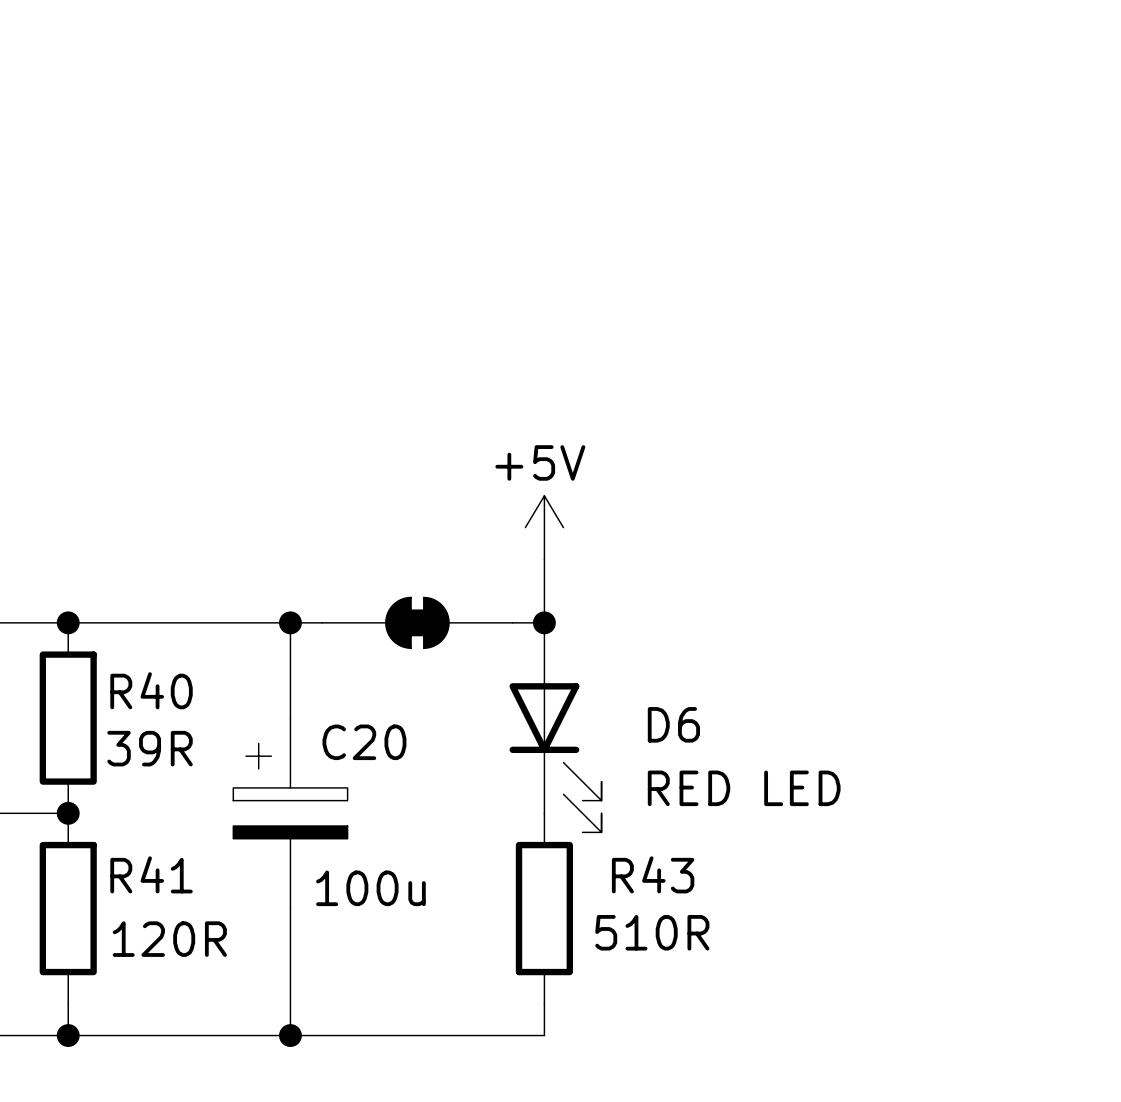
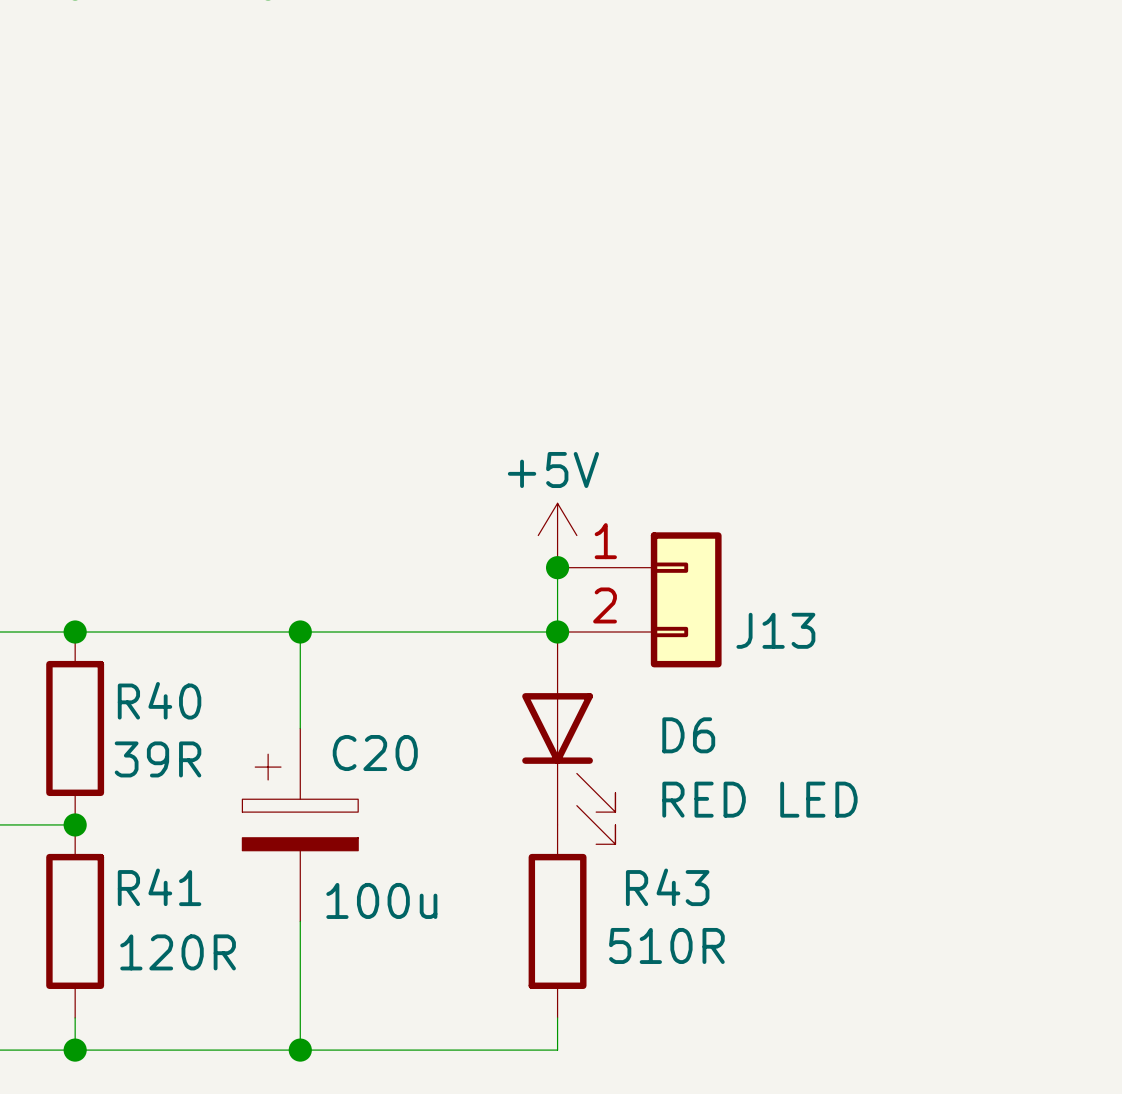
junction: none -> (557, 567)
J13: none -> (639, 599)
part: (417, 622) -> none

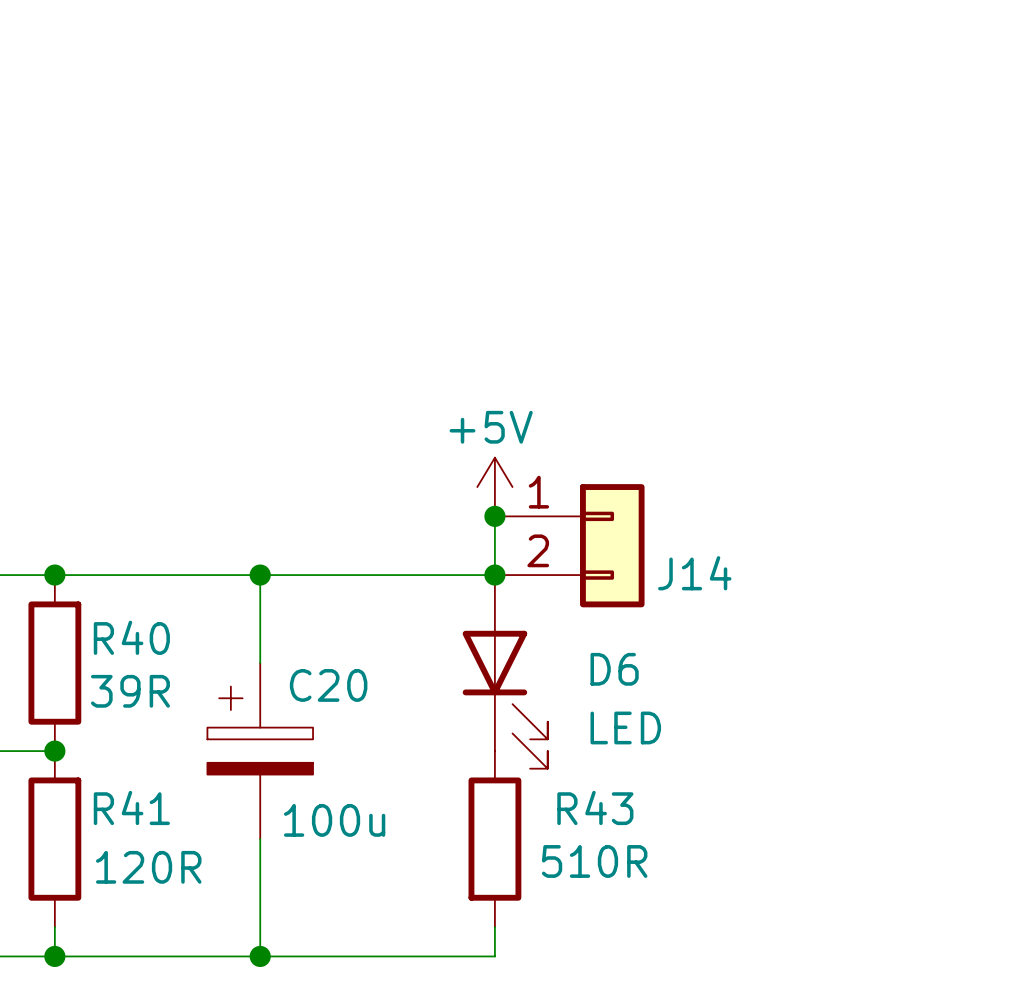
J13 name: J13 (775, 630) -> J14 (694, 573)
D6 value: RED LED (759, 799) -> LED (625, 727)

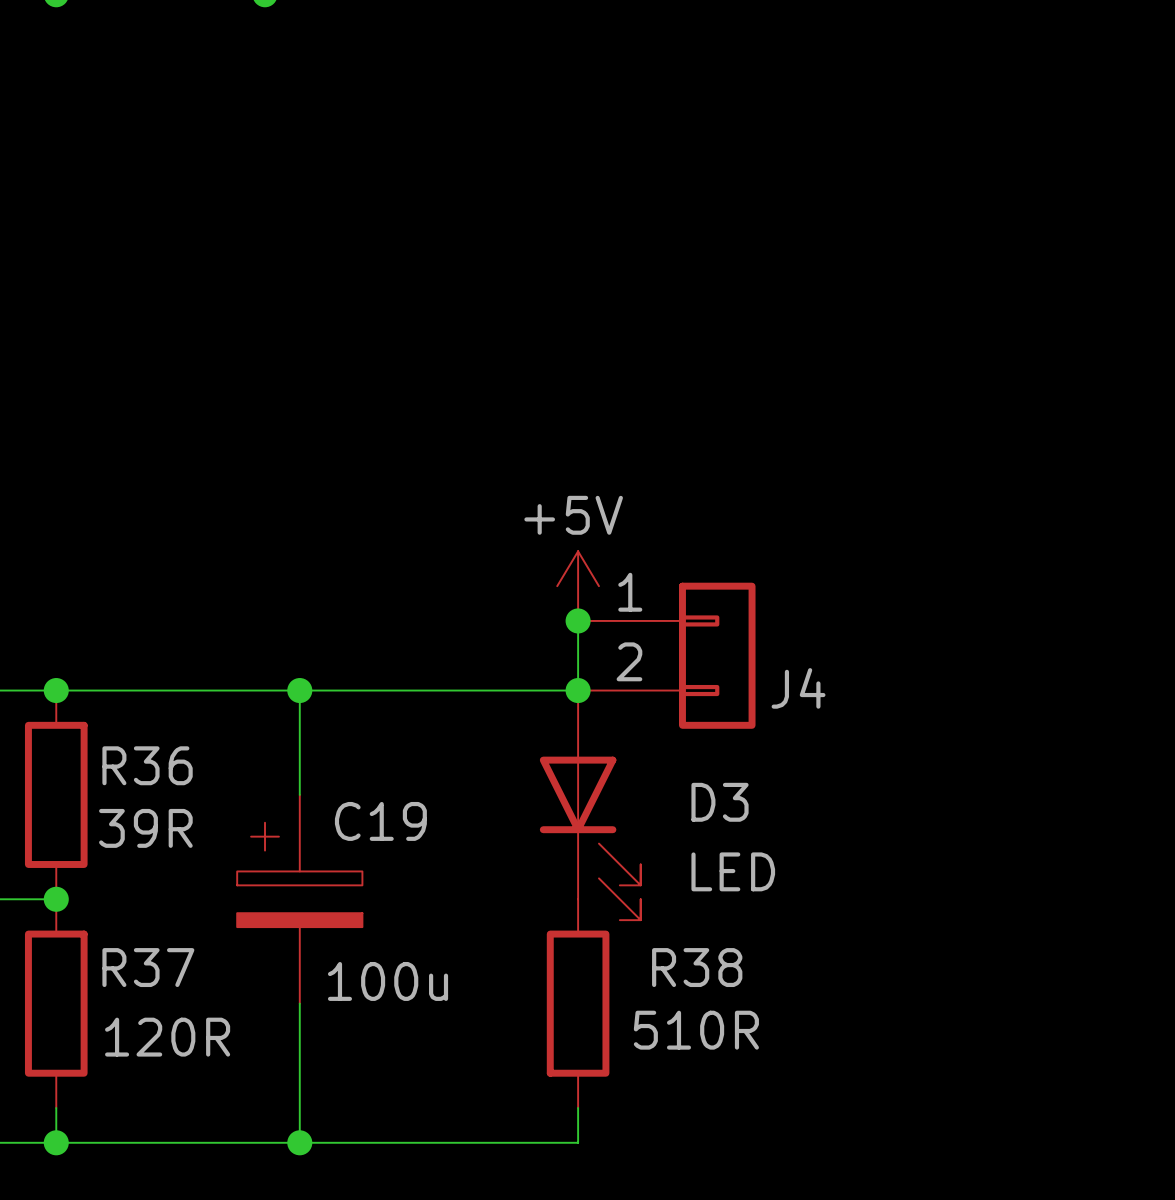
J14 name: J14 (694, 573) -> J4 (798, 688)
R40 name: R40 (131, 637) -> R36 (147, 765)
D6 name: D6 (614, 669) -> D3 (720, 802)
C20 name: C20 (328, 685) -> C19 (380, 821)
R41 name: R41 (131, 807) -> R37 (148, 967)
R43 name: R43 (595, 807) -> R38 (697, 967)

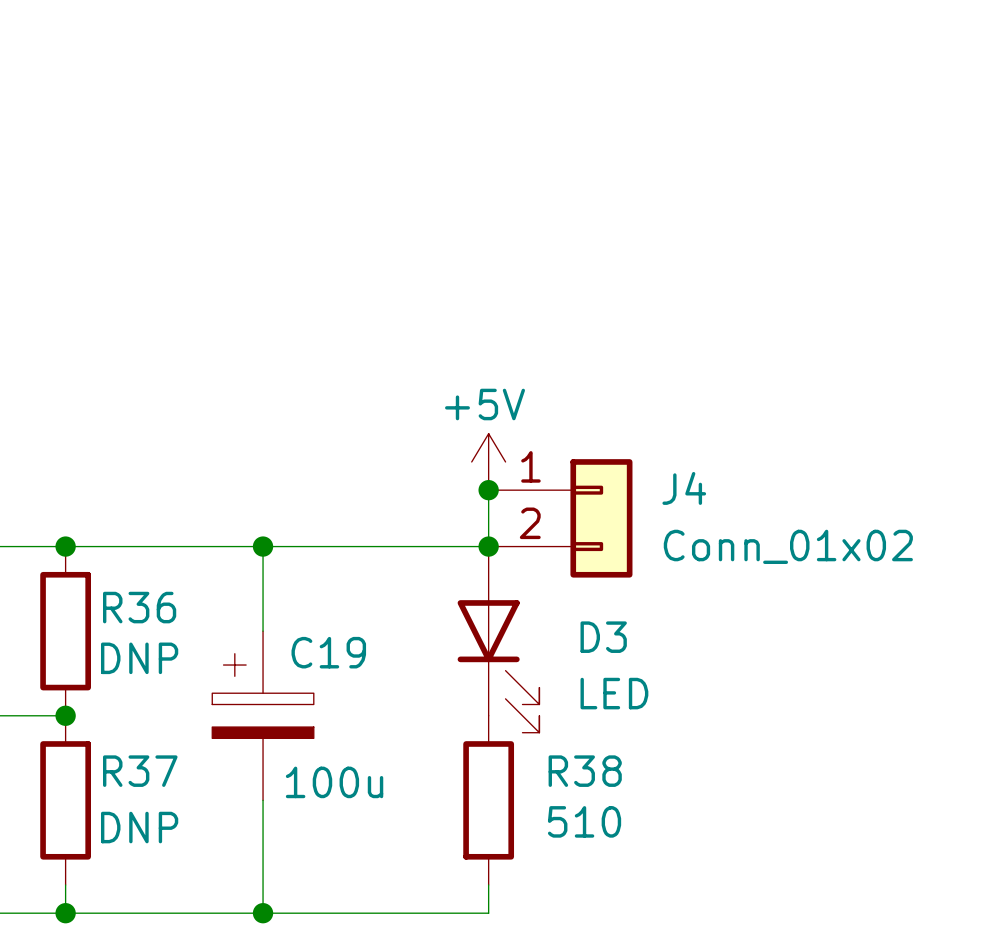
J4 name position: J4 (798, 688) -> J4 (684, 488)
J4 value: none -> Conn_01x02 (788, 546)
R36 value: 39R (145, 828) -> DNP (139, 658)
R38 value: 510R (696, 1030) -> 510 (584, 821)
R37 value: 120R (167, 1037) -> DNP (139, 827)

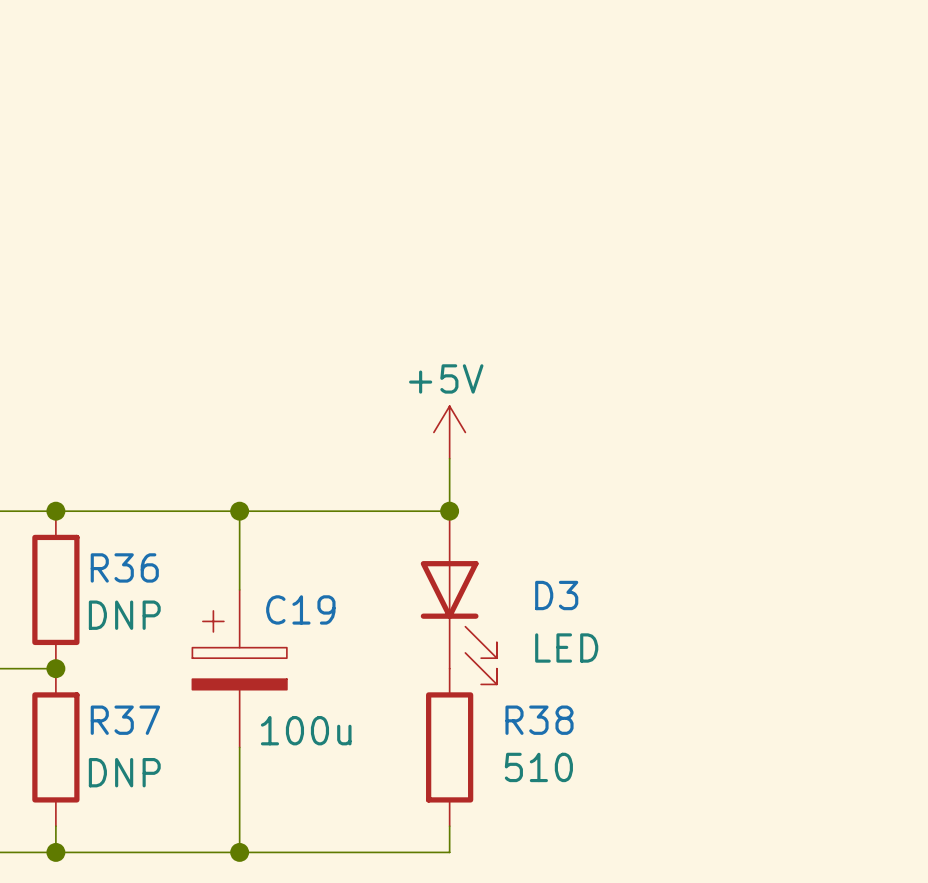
junction: (488, 490) -> none
J4: Conn_01x02 (560, 518) -> none

